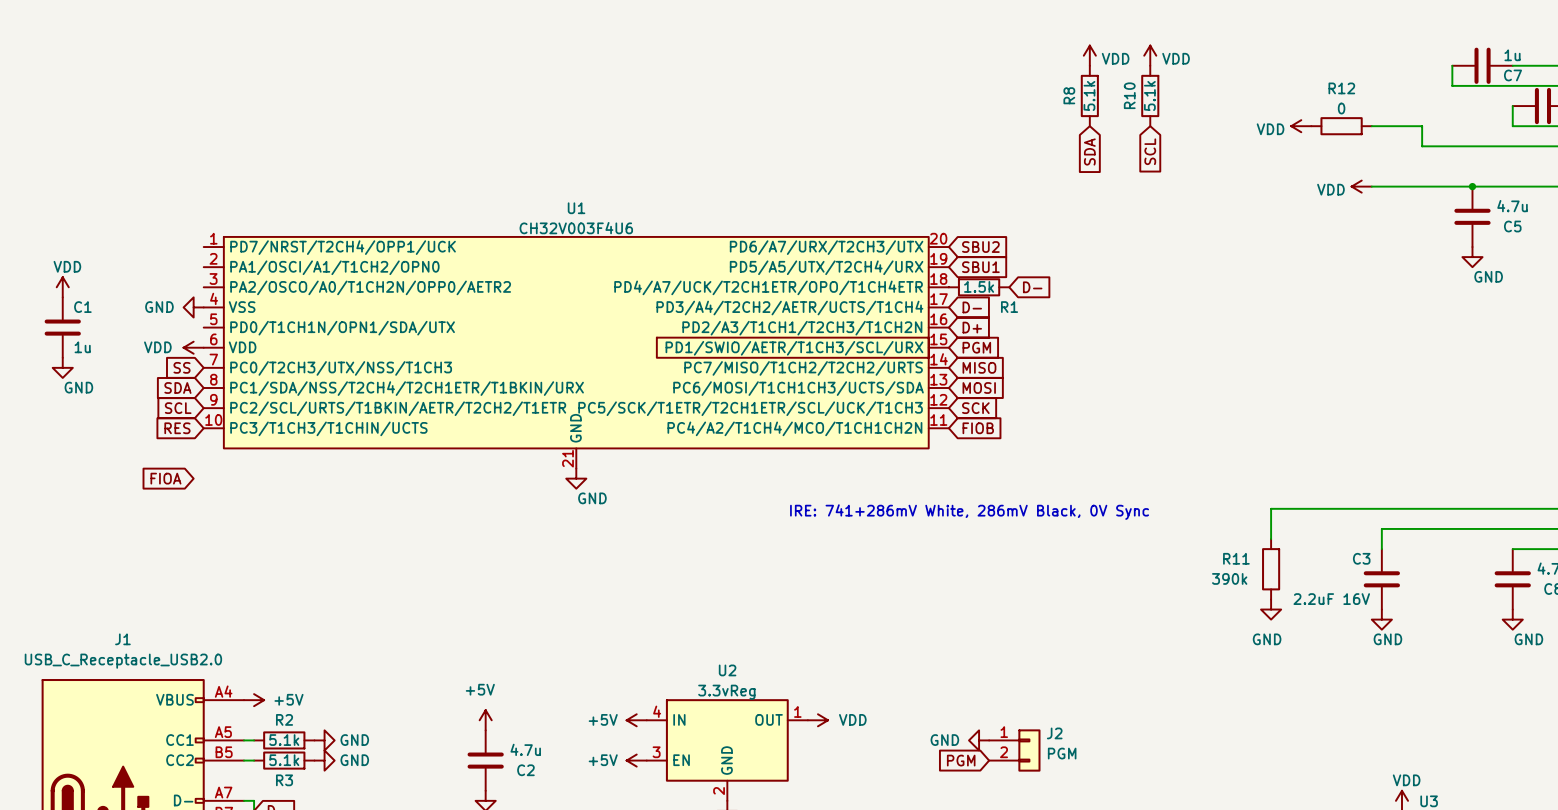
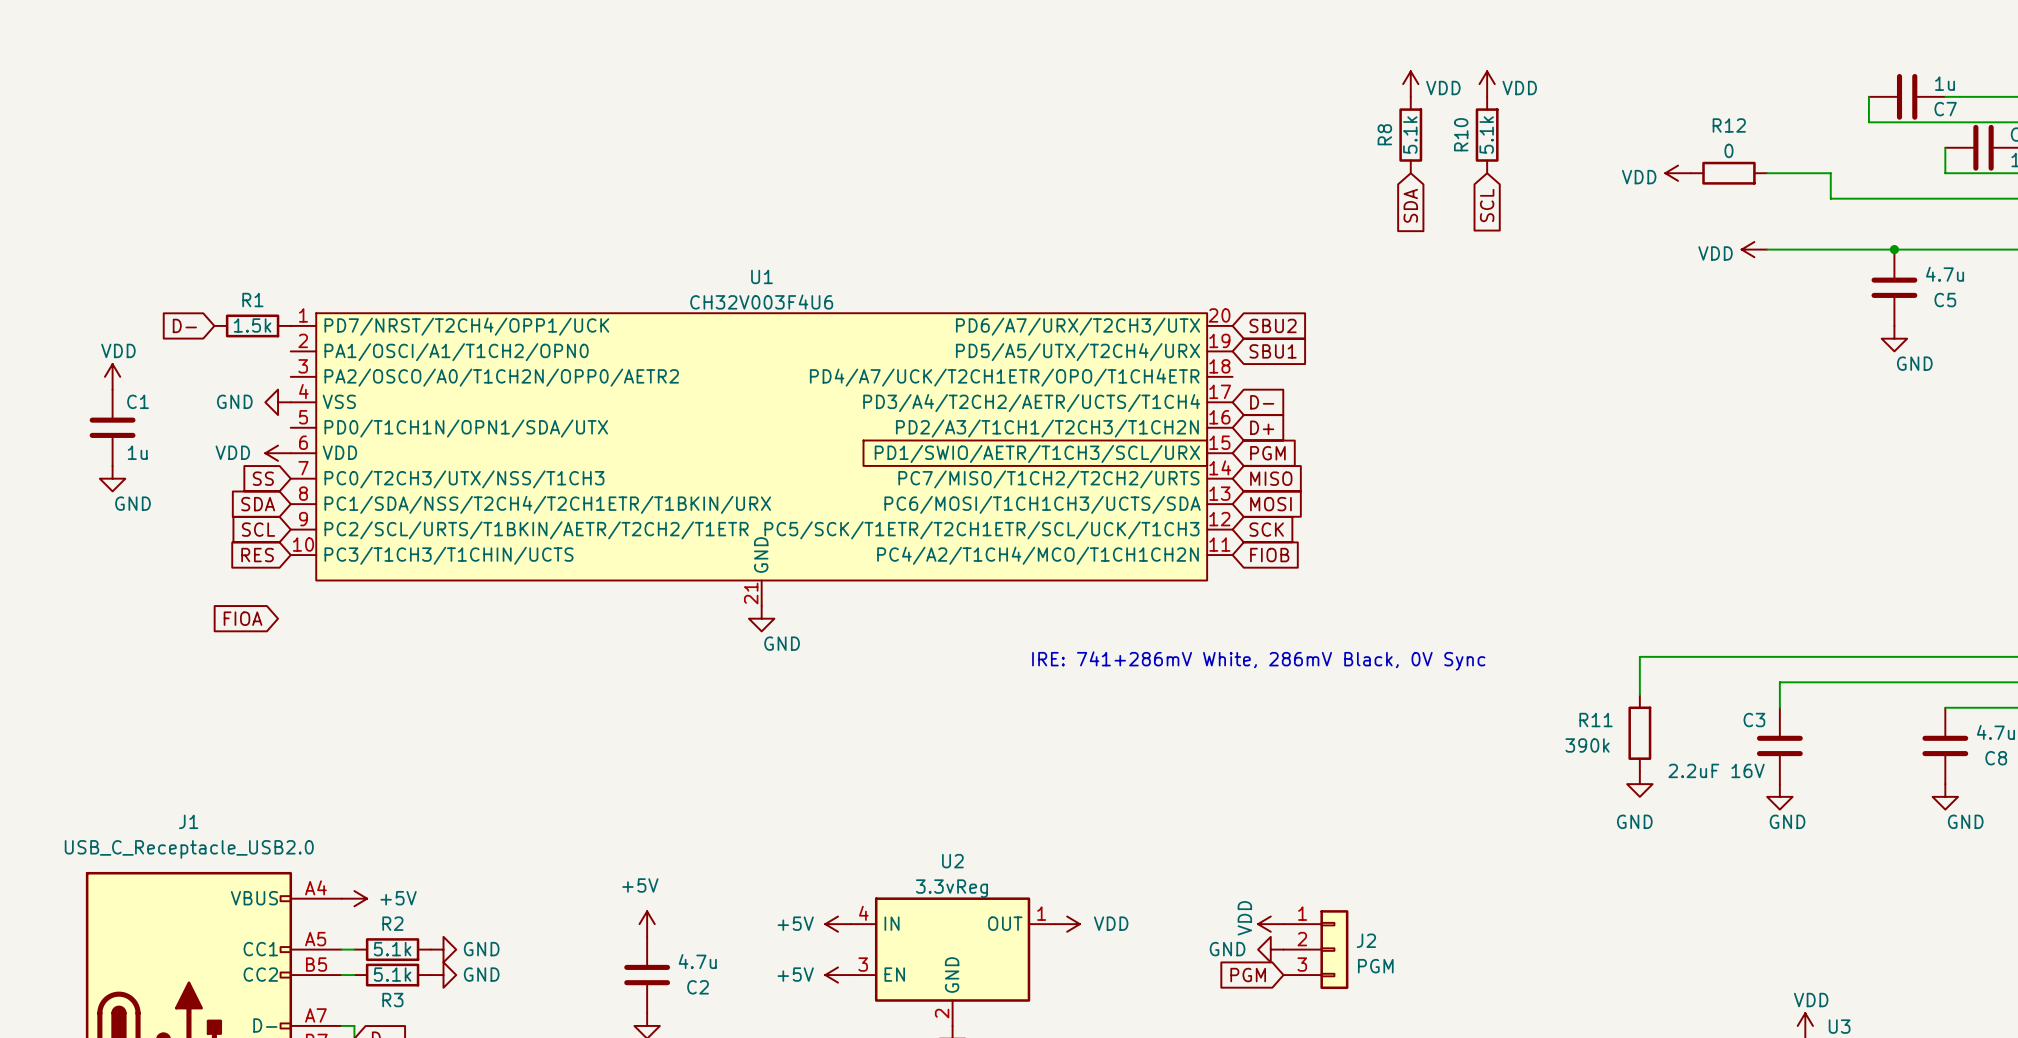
global label: none -> D- (184, 325)
R1 position: (979, 287) -> (252, 325)
global label: D- (1032, 287) -> none
R1 name position: R1 (1009, 307) -> R1 (252, 300)
power symbol: none -> VDD (1270, 924)
J2 symbol: [989, 729, 1041, 772] -> [1283, 910, 1349, 990]

